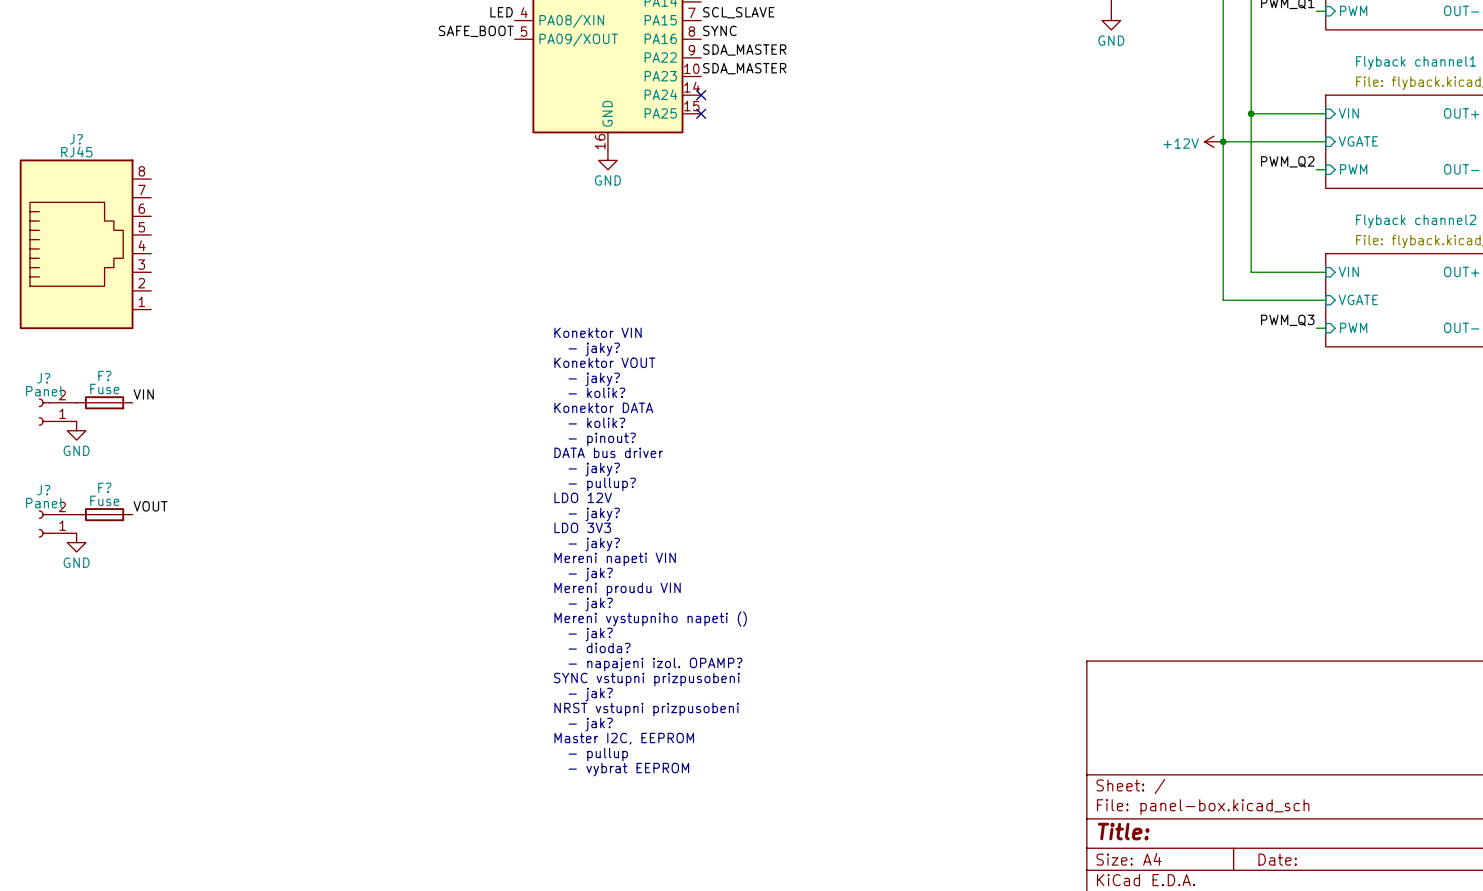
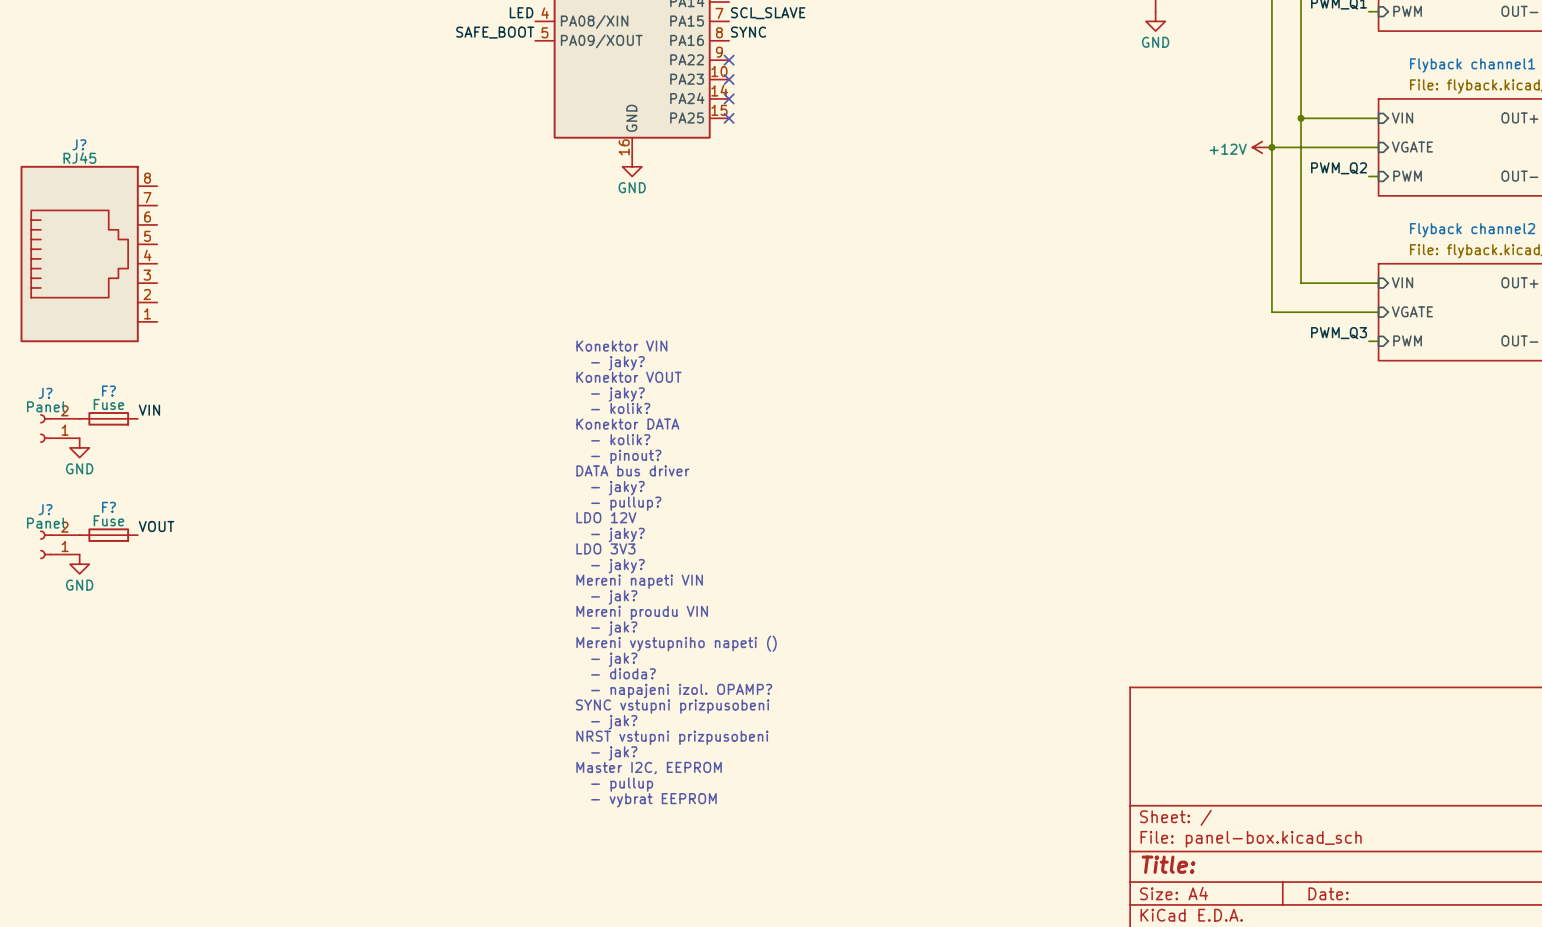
label: SDA_MASTER (744, 49) -> none
no-connect mark: none -> (729, 60)
label: SDA_MASTER (744, 68) -> none
no-connect mark: none -> (729, 79)

